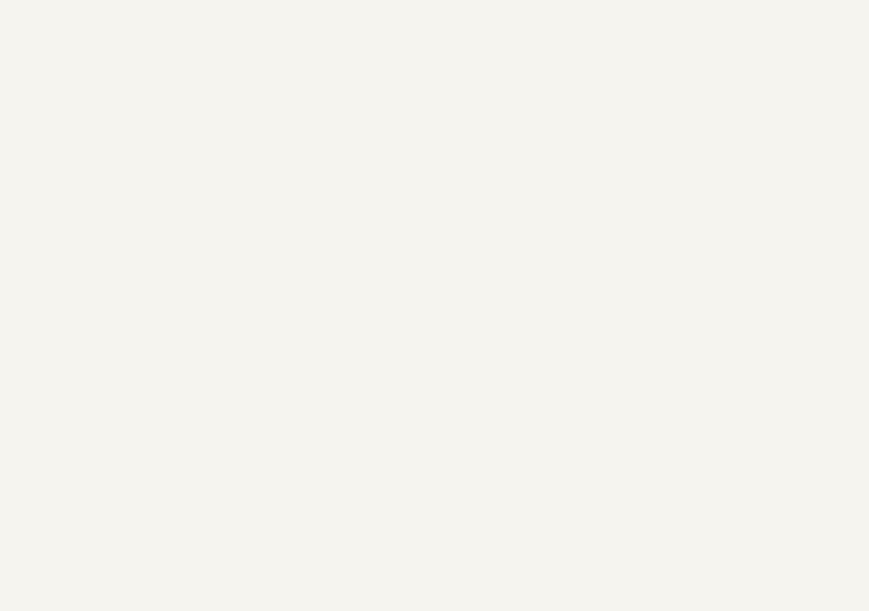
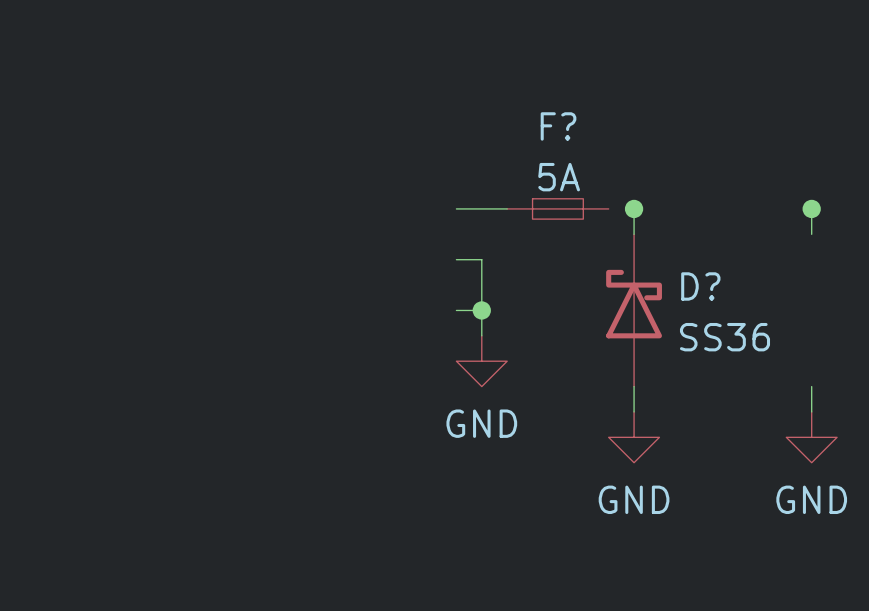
wire: none -> (456, 208) (507, 208)
F?: none -> 5A (557, 208)
wire: none -> (634, 208) (634, 234)
junction: none -> (634, 208)
wire: none -> (811, 208) (811, 234)
junction: none -> (811, 208)
wire: none -> (456, 259) (481, 259) (481, 335)
wire: none -> (456, 310) (481, 310)
junction: none -> (481, 310)
D?: none -> SS36 (634, 310)
power symbol: none -> GND (481, 361)
wire: none -> (634, 386) (634, 411)
wire: none -> (811, 386) (811, 411)
power symbol: none -> GND (634, 437)
power symbol: none -> GND (811, 437)

